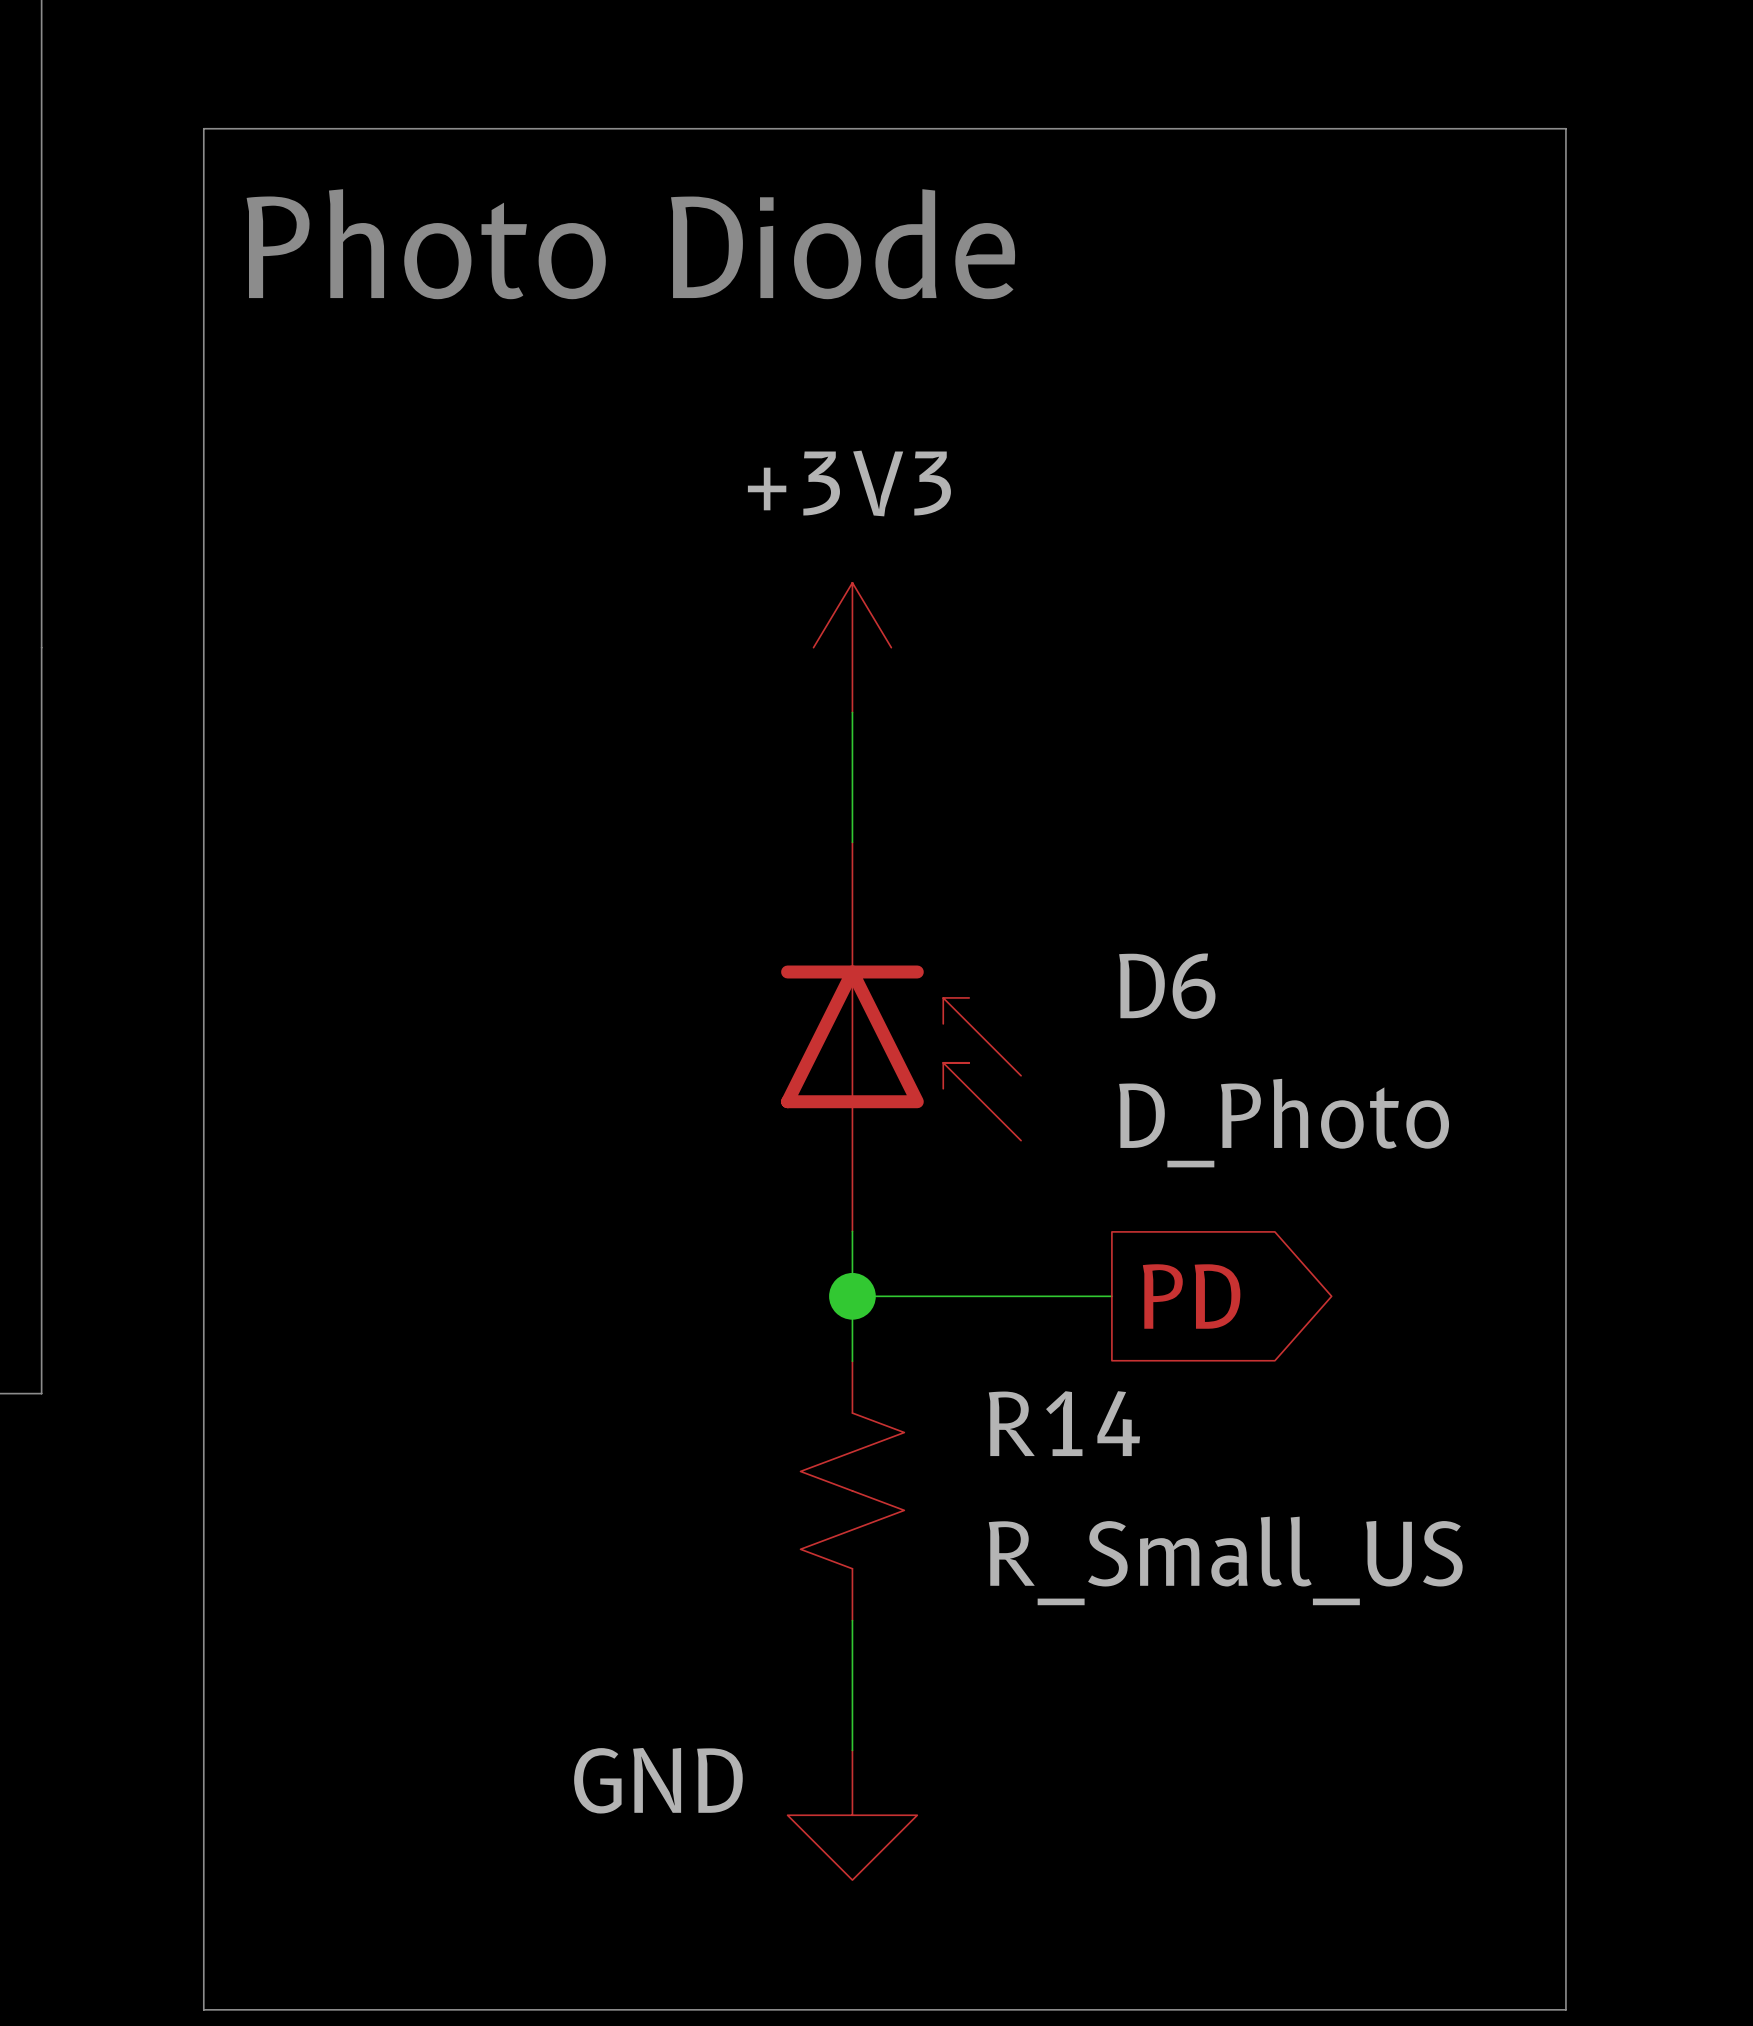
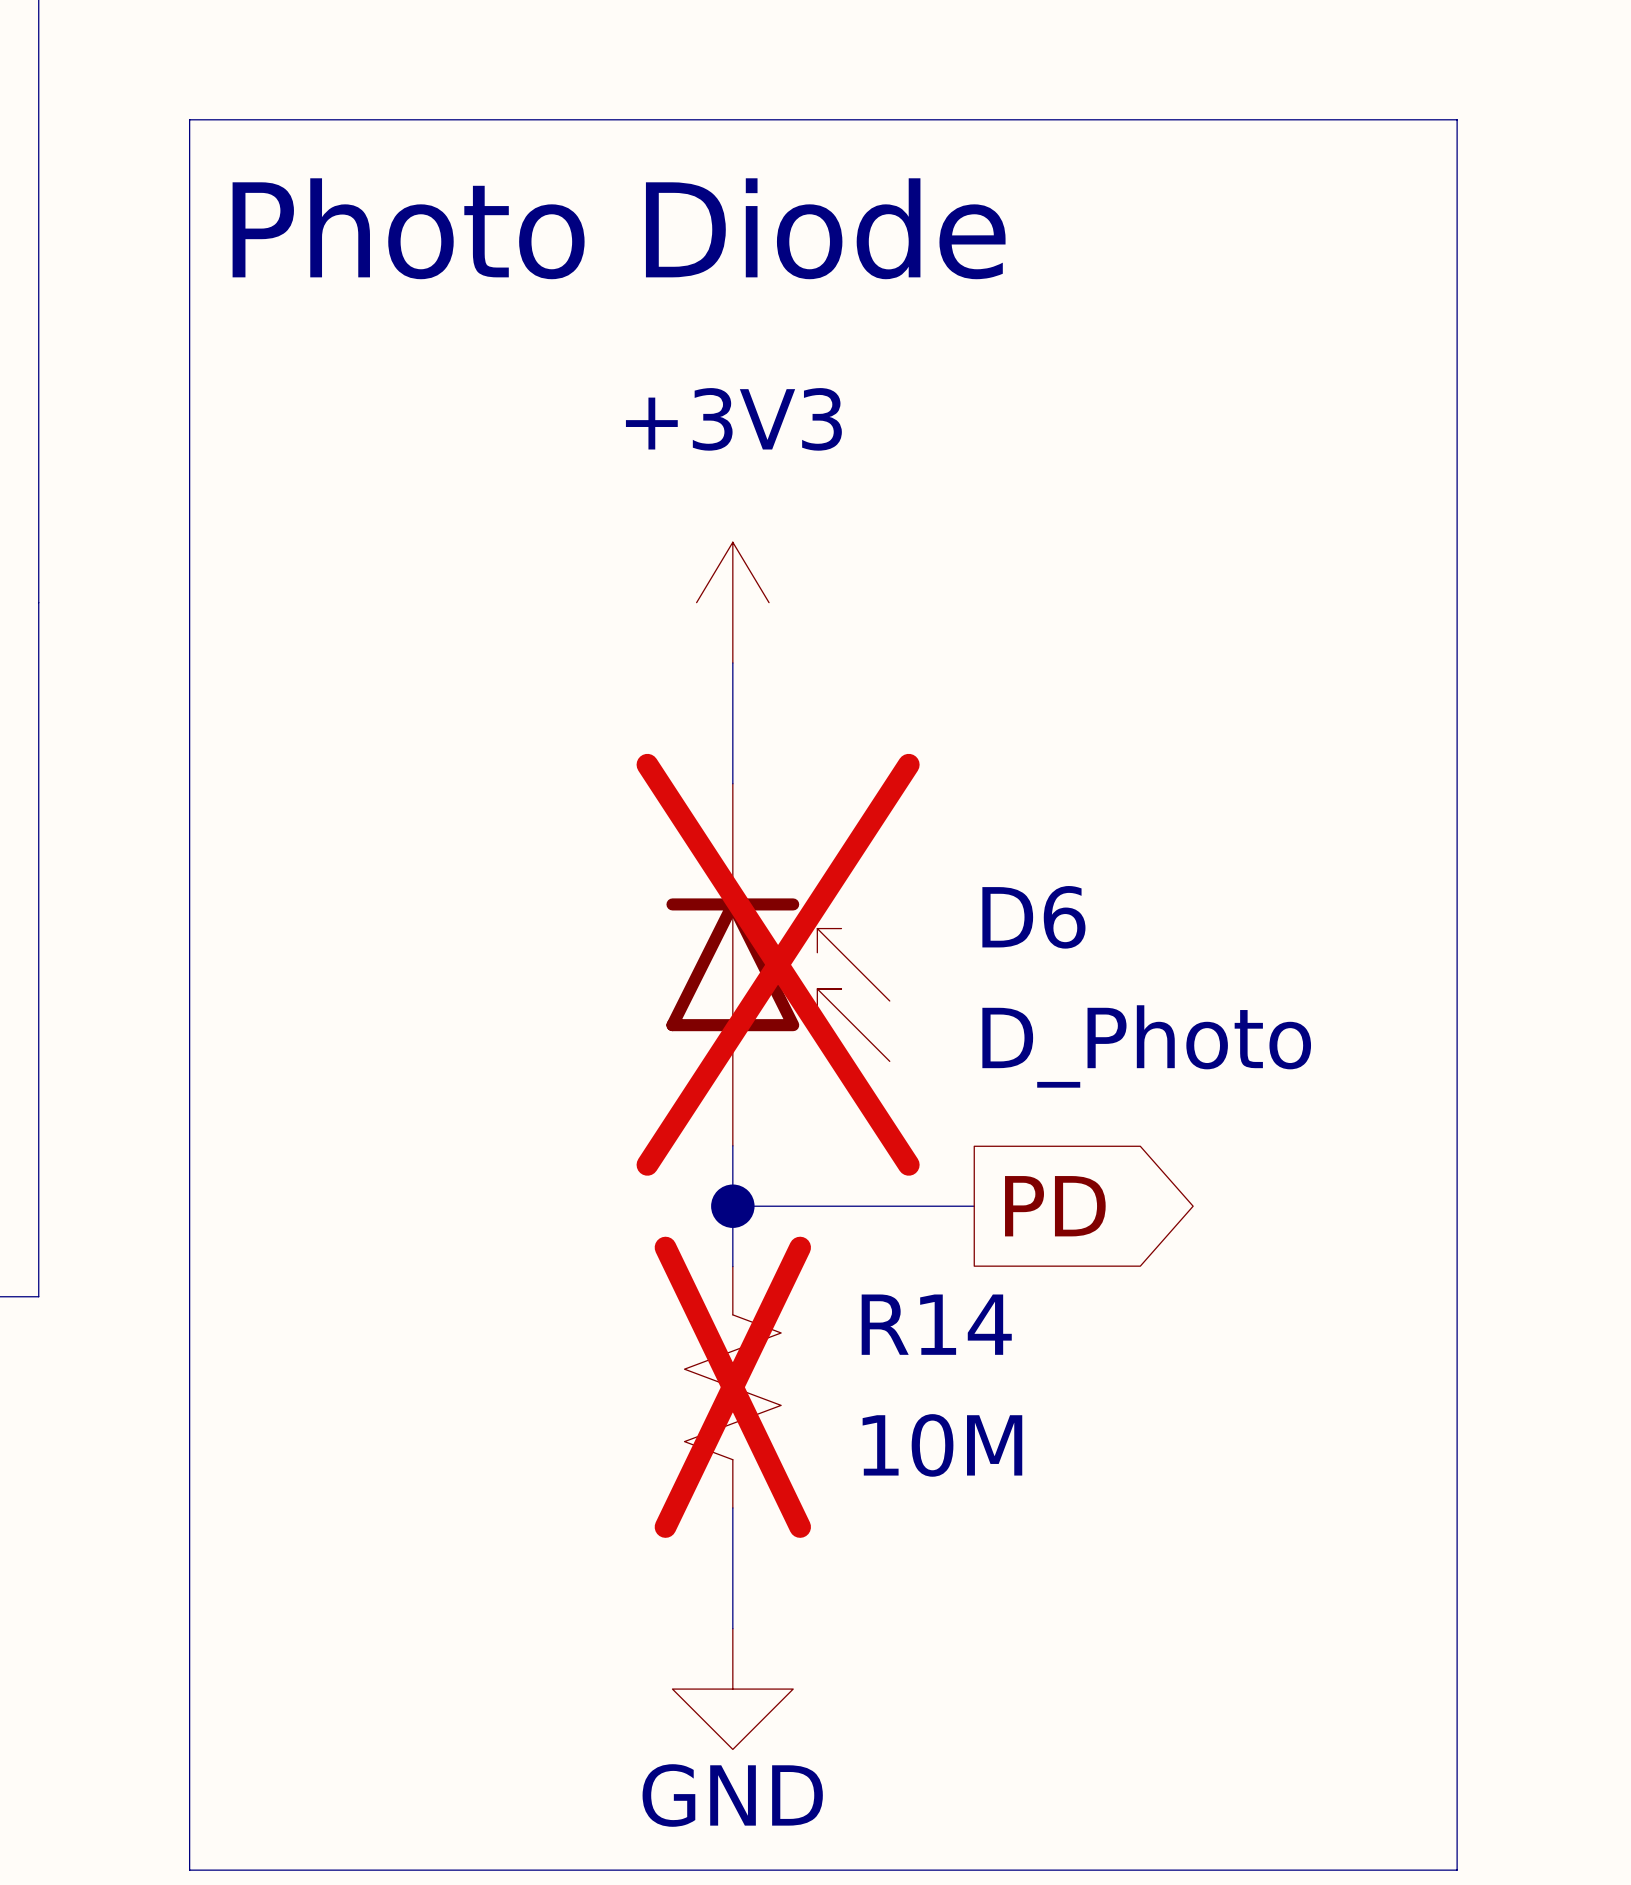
power symbol text position: +3V3 (849, 483) -> +3V3 (733, 419)
power symbol position: +3V3 (852, 647) -> +3V3 (732, 602)
wire: (852, 712) (852, 842) -> (732, 663) (732, 783)
D6 do-not-place cross: none -> (778, 964)
D6 position: (901, 1036) -> (778, 964)
wire: (852, 1231) (852, 1361) -> (732, 1145) (732, 1266)
junction position: (852, 1296) -> (732, 1206)
wire: (1047, 1296) (1111, 1296) -> (732, 1206) (793, 1206)
global label position: PD (1191, 1296) -> PD (1055, 1206)
R14 do-not-place cross: none -> (732, 1387)
R14 position: (852, 1490) -> (732, 1387)
R14 value: R_Small_US (1225, 1560) -> 10M (942, 1445)
wire: (852, 1620) (852, 1750) -> (732, 1508) (732, 1628)
power symbol text position: GND (658, 1780) -> GND (732, 1795)
power symbol position: GND (852, 1815) -> GND (732, 1689)

